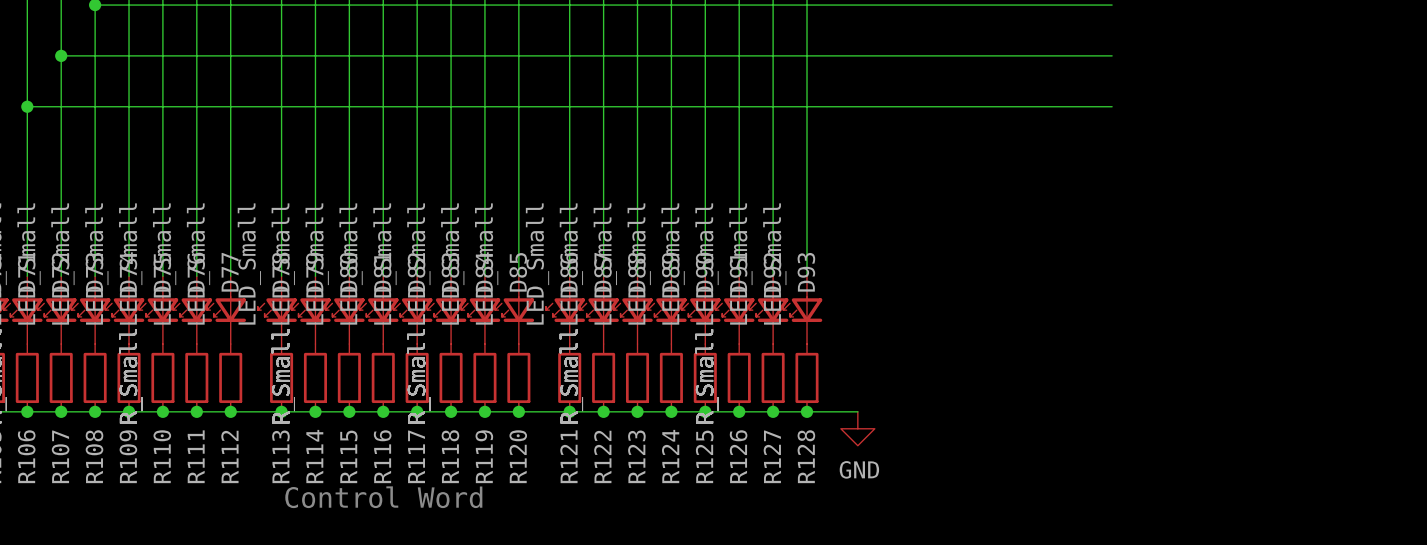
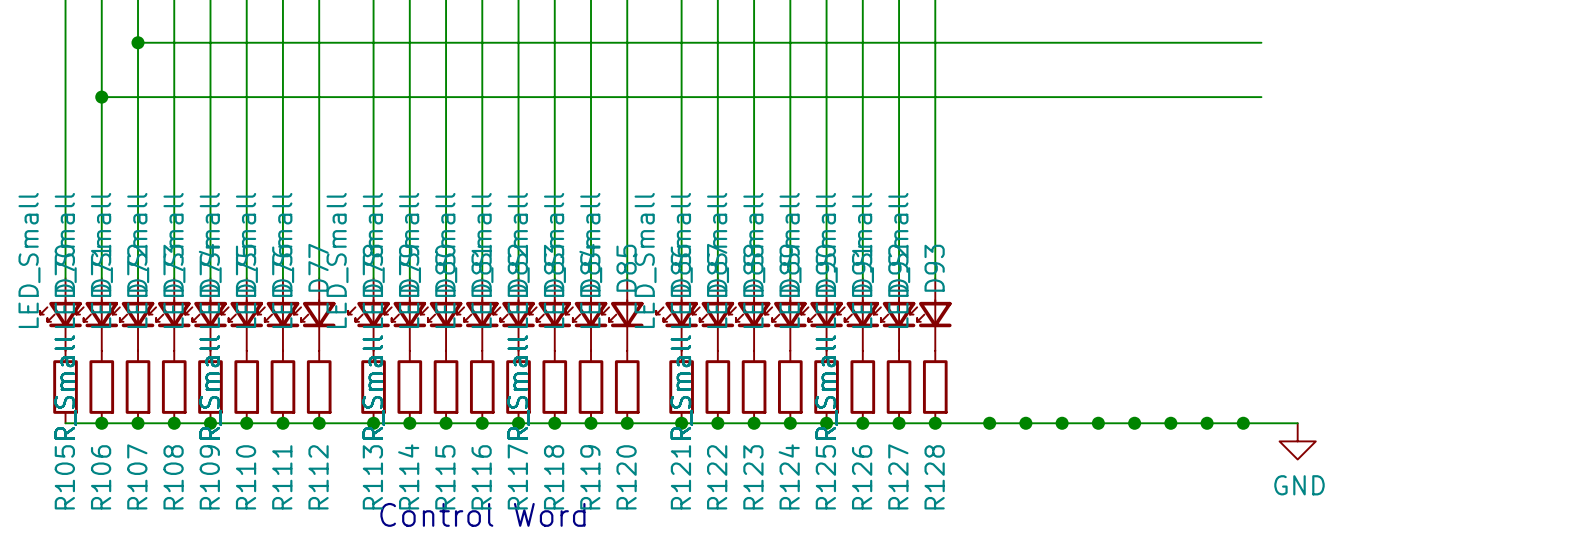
wire: none -> (989, 423) (1297, 423)
junction: none -> (989, 423)
junction: none -> (1025, 423)
junction: none -> (1062, 423)
junction: none -> (1098, 423)
junction: none -> (1134, 423)
junction: none -> (1170, 423)
junction: none -> (1207, 423)
junction: none -> (1243, 423)
power symbol position: GND (857, 428) -> GND (1297, 441)

